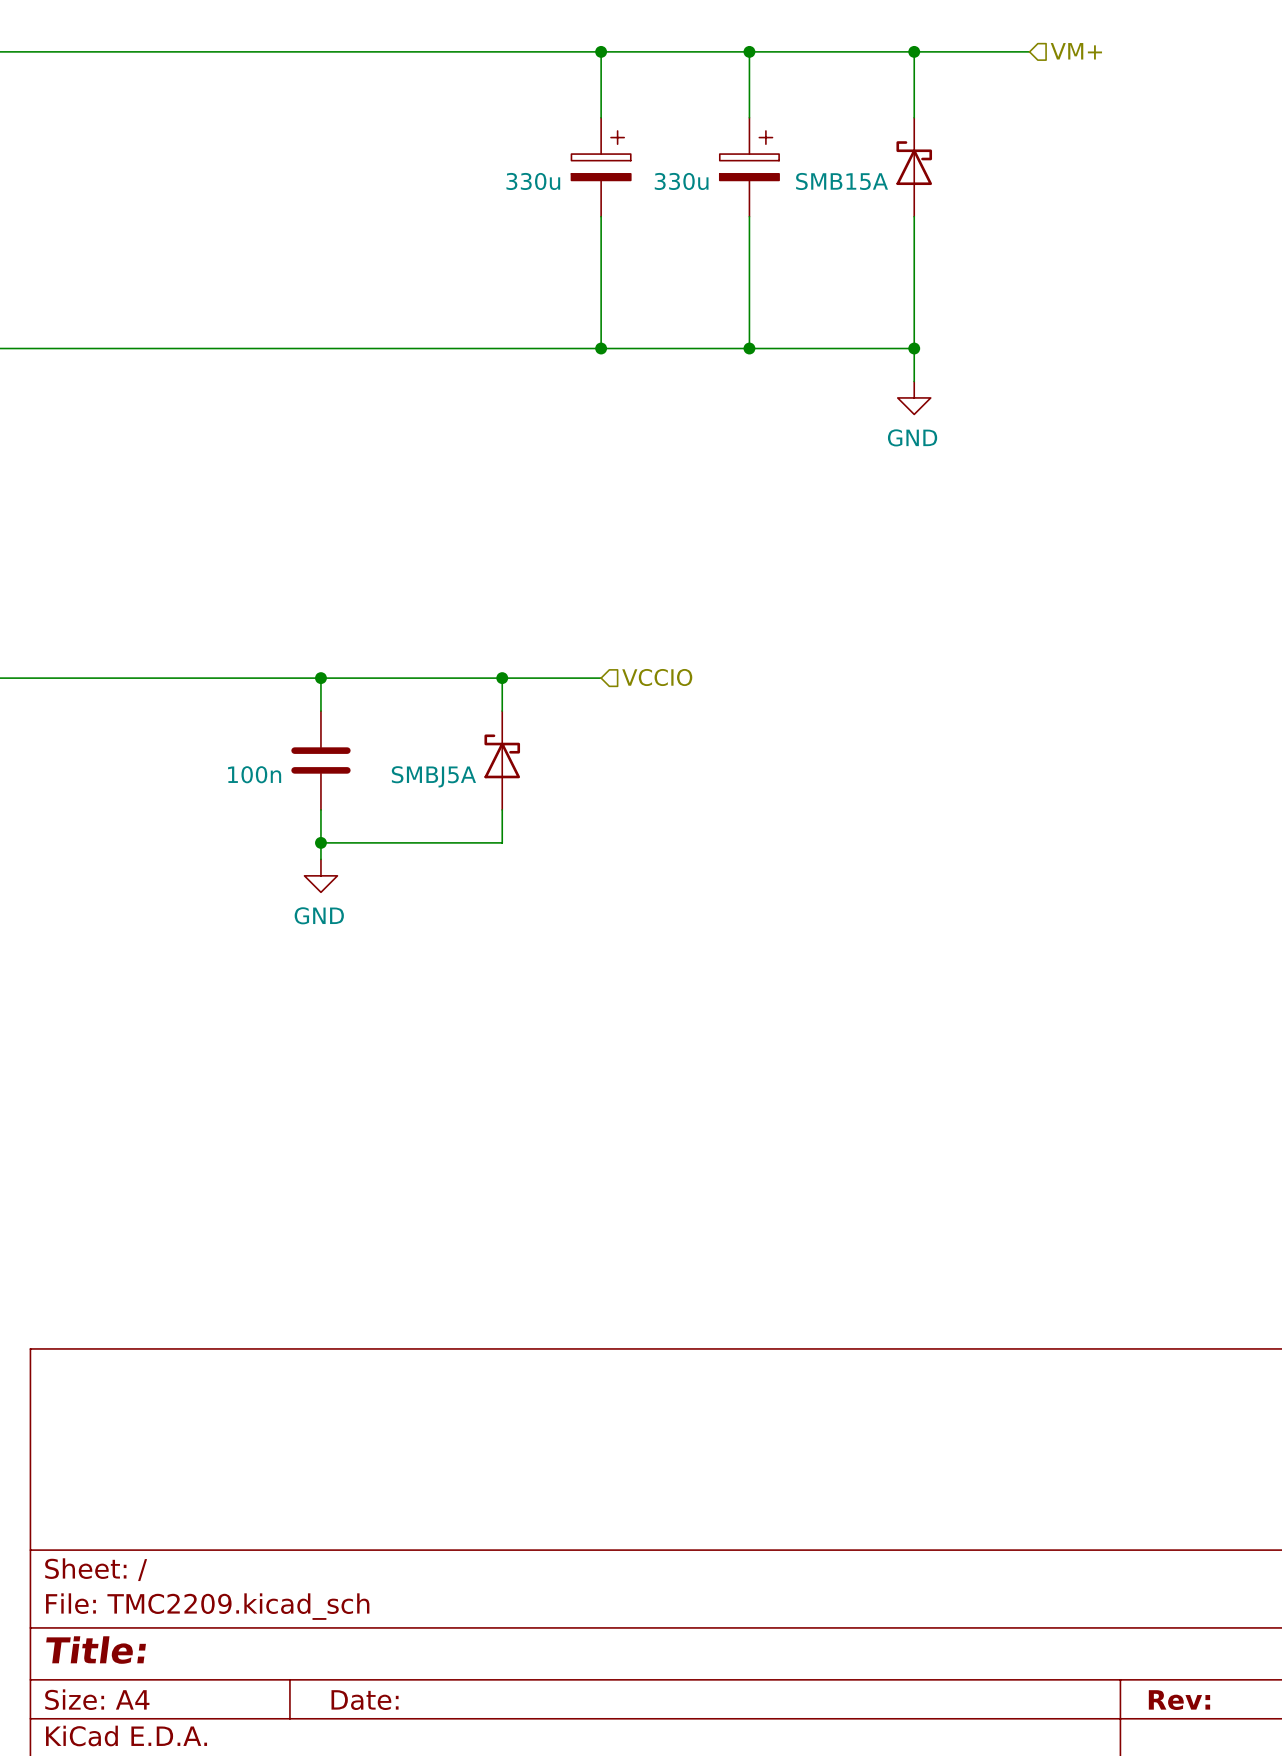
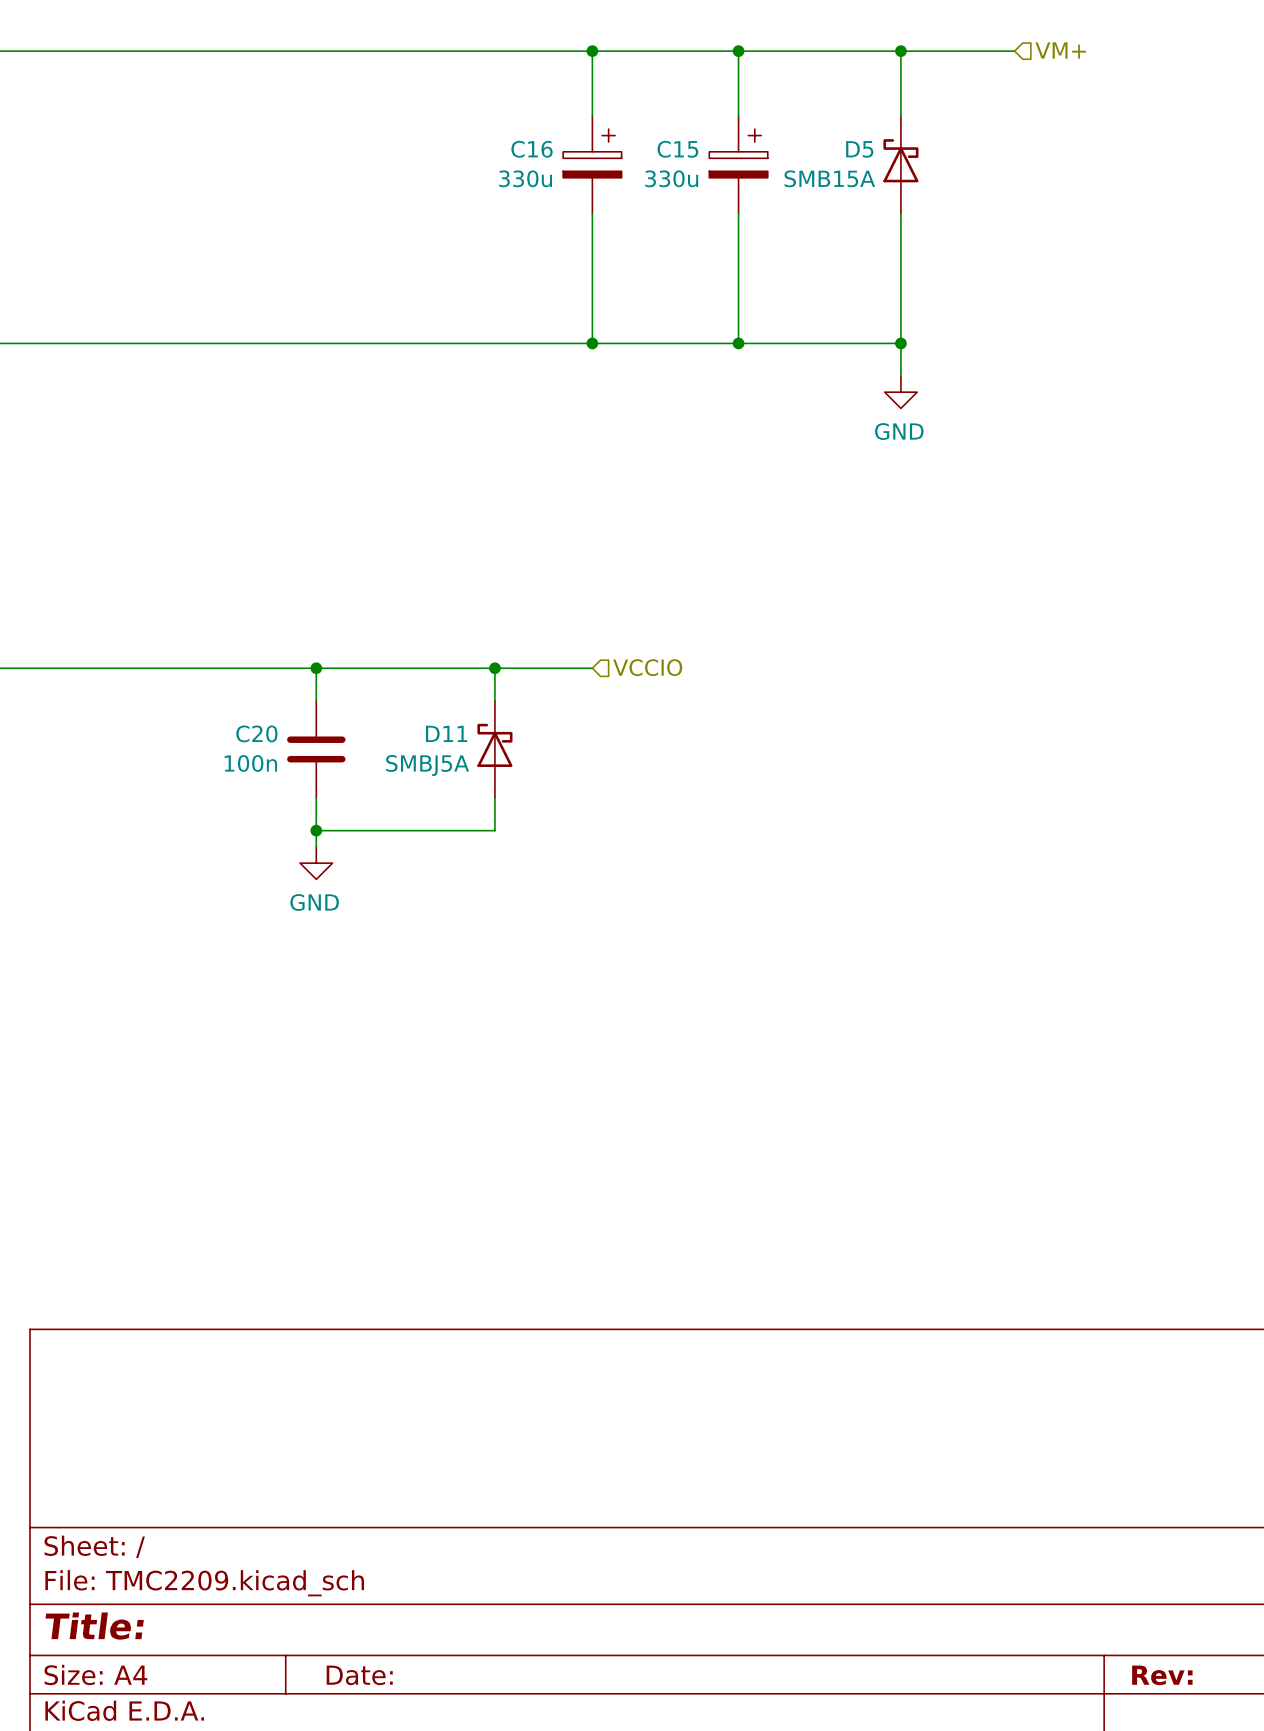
C16 name: none -> C16 (532, 149)
C15 name: none -> C15 (677, 149)
D5 name: none -> D5 (859, 149)
C20 name: none -> C20 (256, 733)
D11 name: none -> D11 (446, 733)

